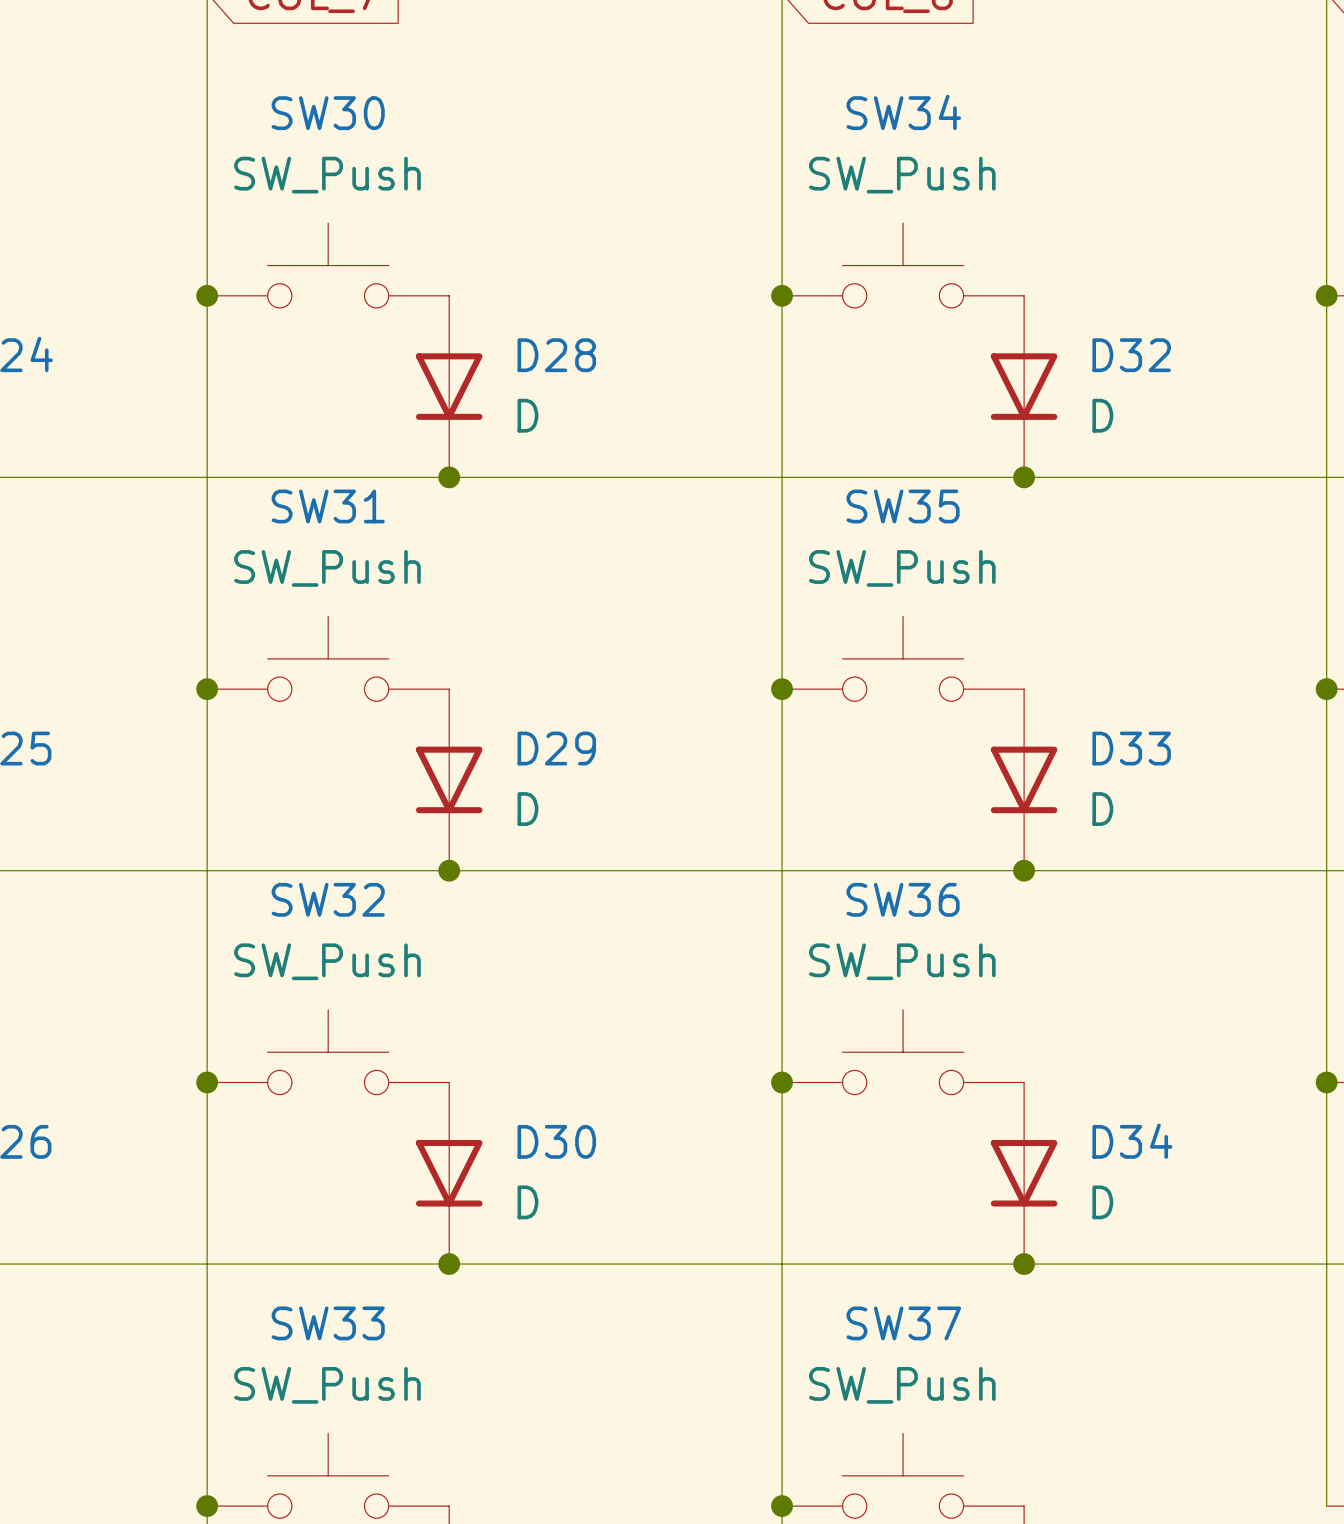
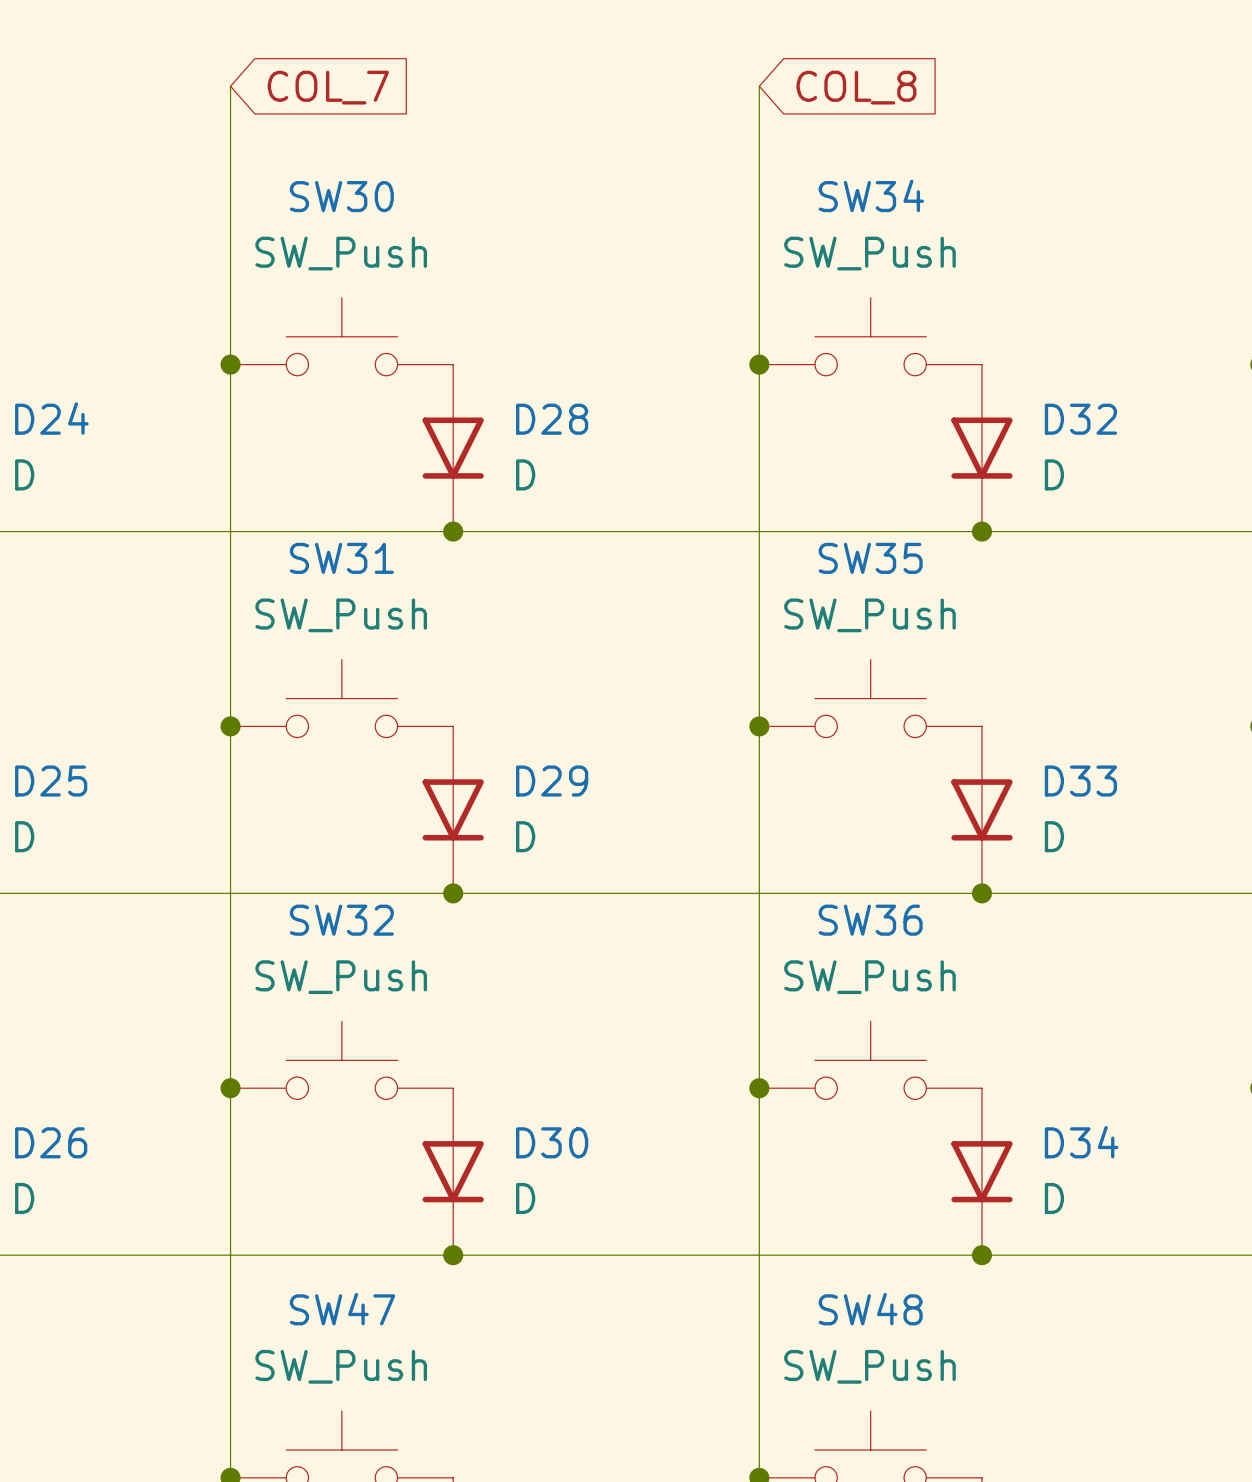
SW33 name: SW33 (328, 1323) -> SW47 (342, 1309)
SW37 name: SW37 (903, 1323) -> SW48 (870, 1309)

